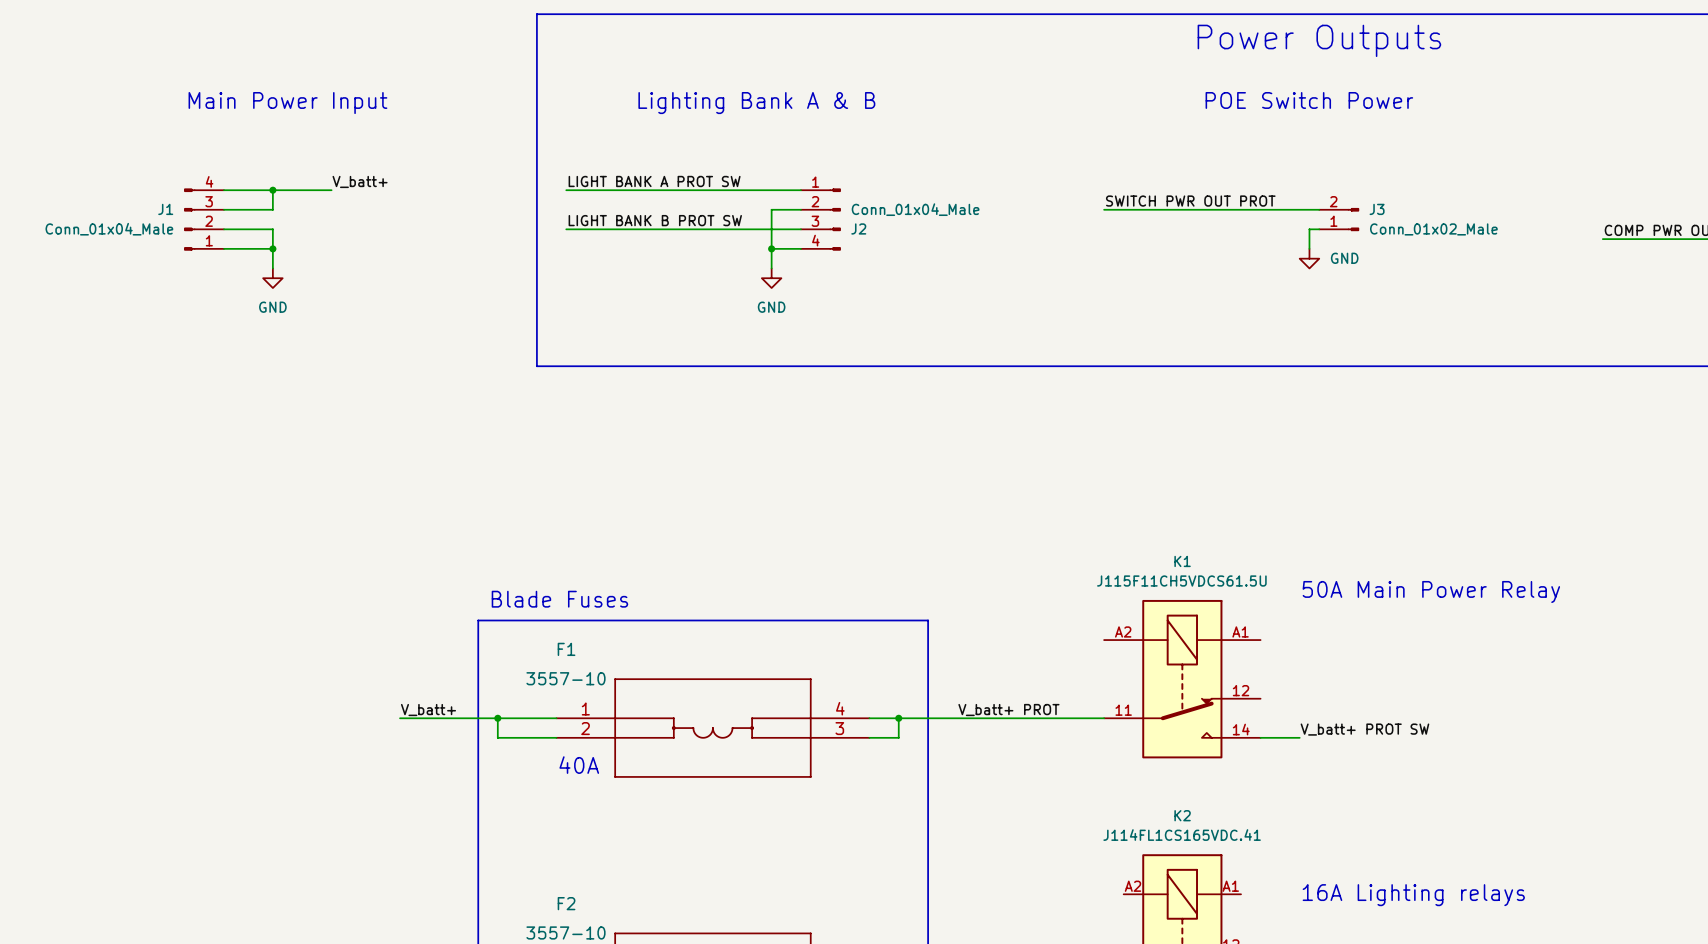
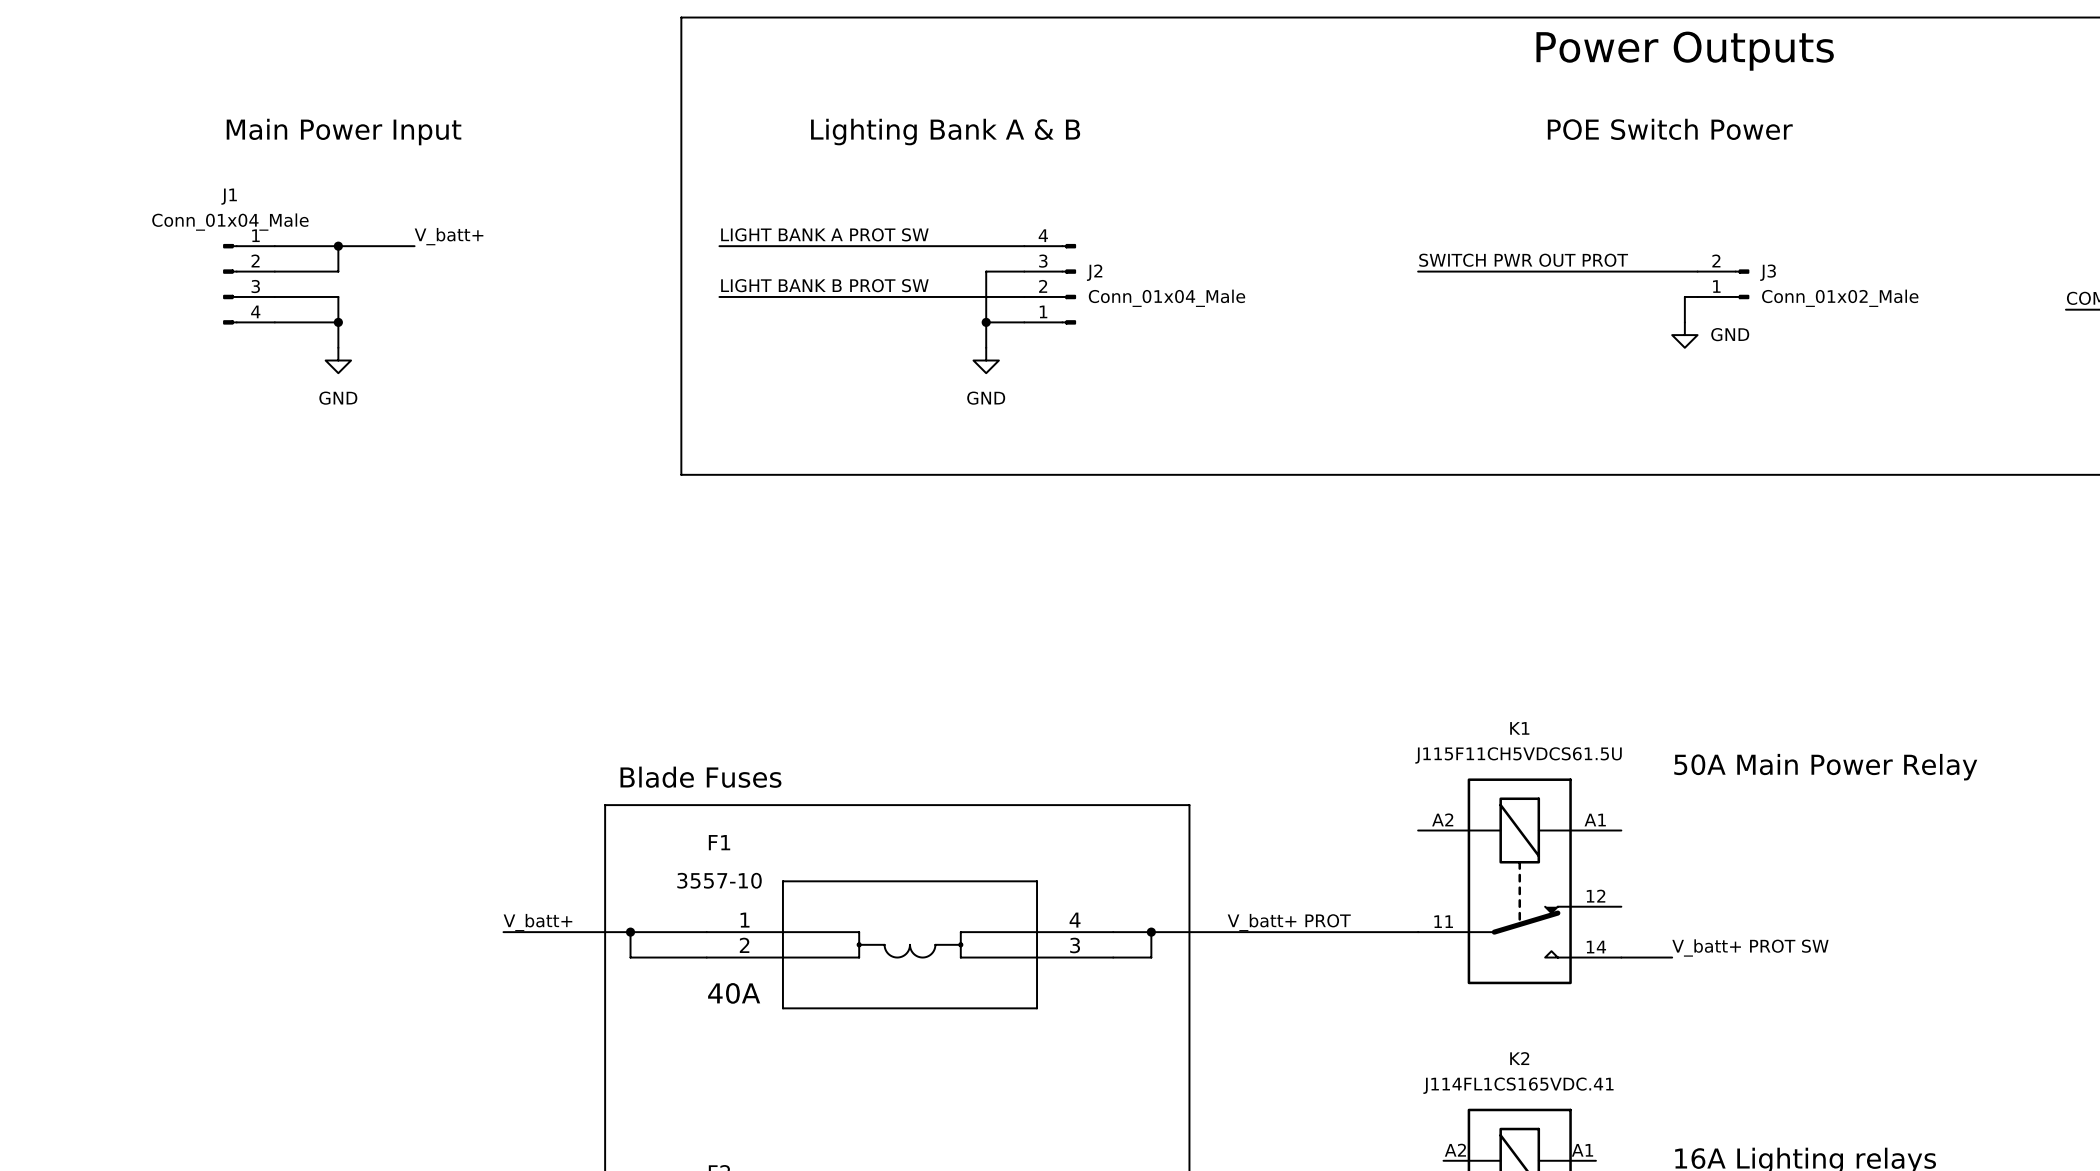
J1 name position: J1 (165, 209) -> J1 (229, 196)
J1 flip: as is (189, 219) -> up-down (230, 284)
J2 flip: as is (835, 219) -> up-down (1068, 284)
J1 value position: Conn_01x04_Male (109, 229) -> Conn_01x04_Male (230, 222)

